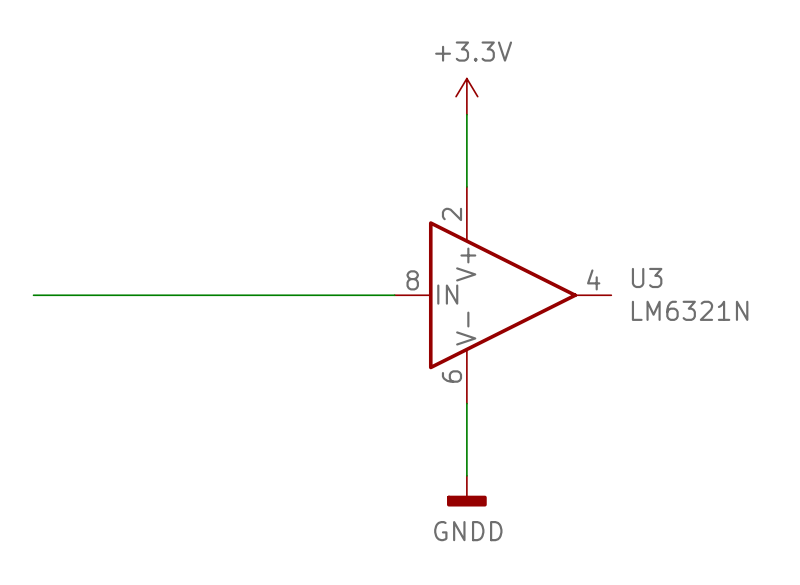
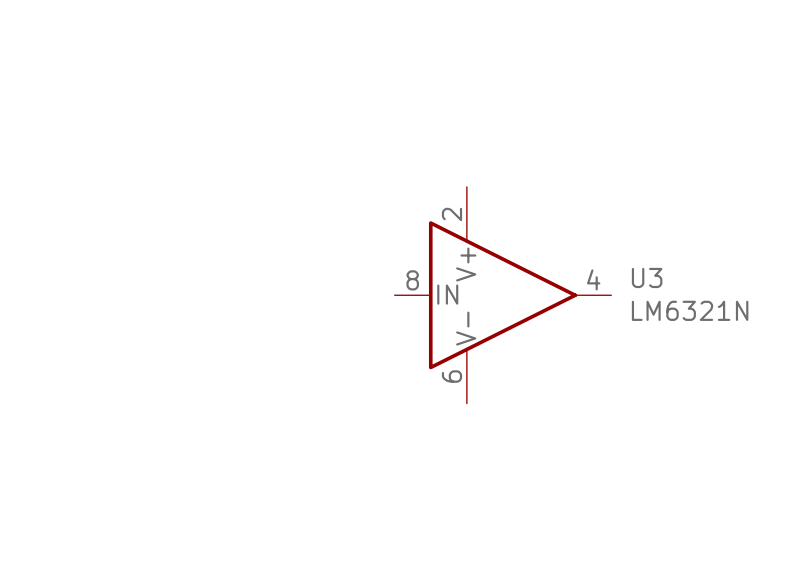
power symbol: +3.3V (466, 96) -> none
wire: (466, 114) (466, 186) -> none
wire: (33, 295) (394, 295) -> none
wire: (466, 403) (466, 475) -> none
power symbol: GNDD (466, 491) -> none

